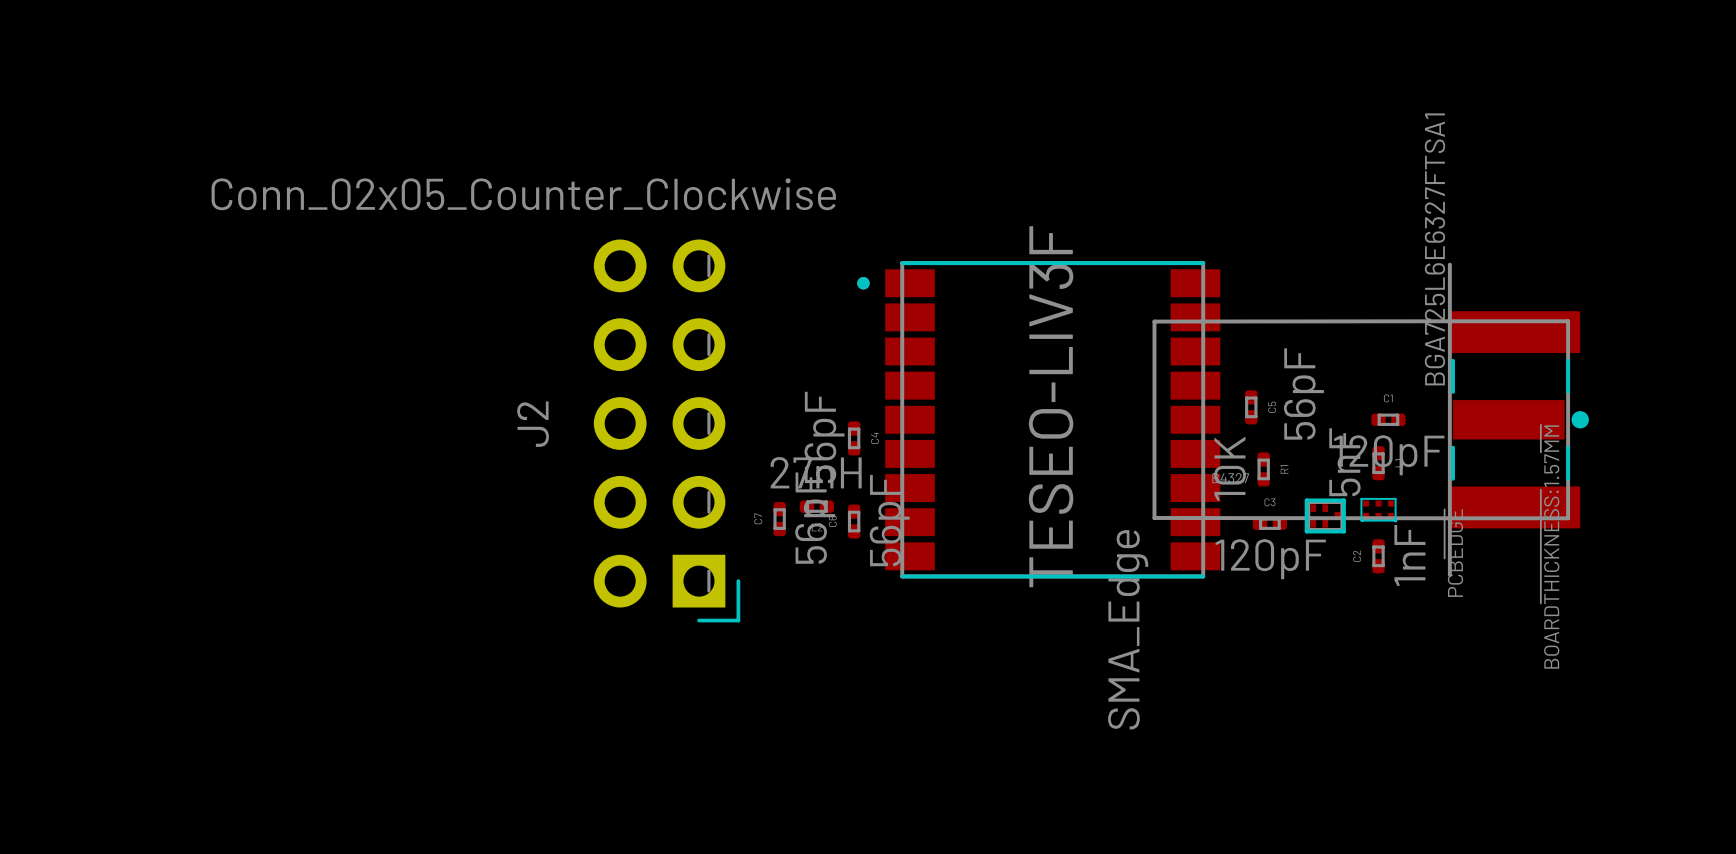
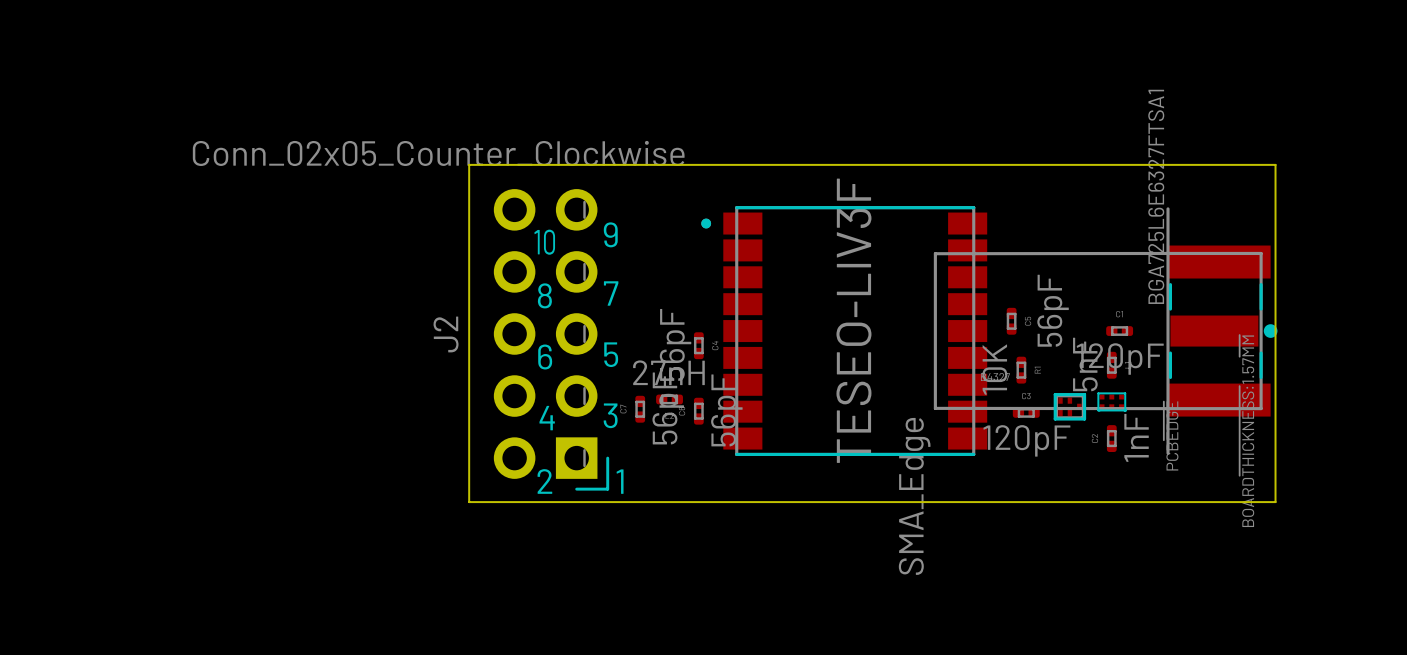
board edge: none -> (469, 164) (469, 502) (1275, 502) (1275, 164) (469, 164)
text: none -> 9 (610, 234)
text: none -> 10 (544, 242)
text: none -> 7 (611, 293)
text: none -> 8 (544, 295)
text: none -> 5 (611, 354)
text: none -> 6 (545, 356)
text: none -> 3 (610, 415)
text: none -> 4 (547, 418)
text: none -> 2 (544, 481)
text: none -> 1 (620, 481)

